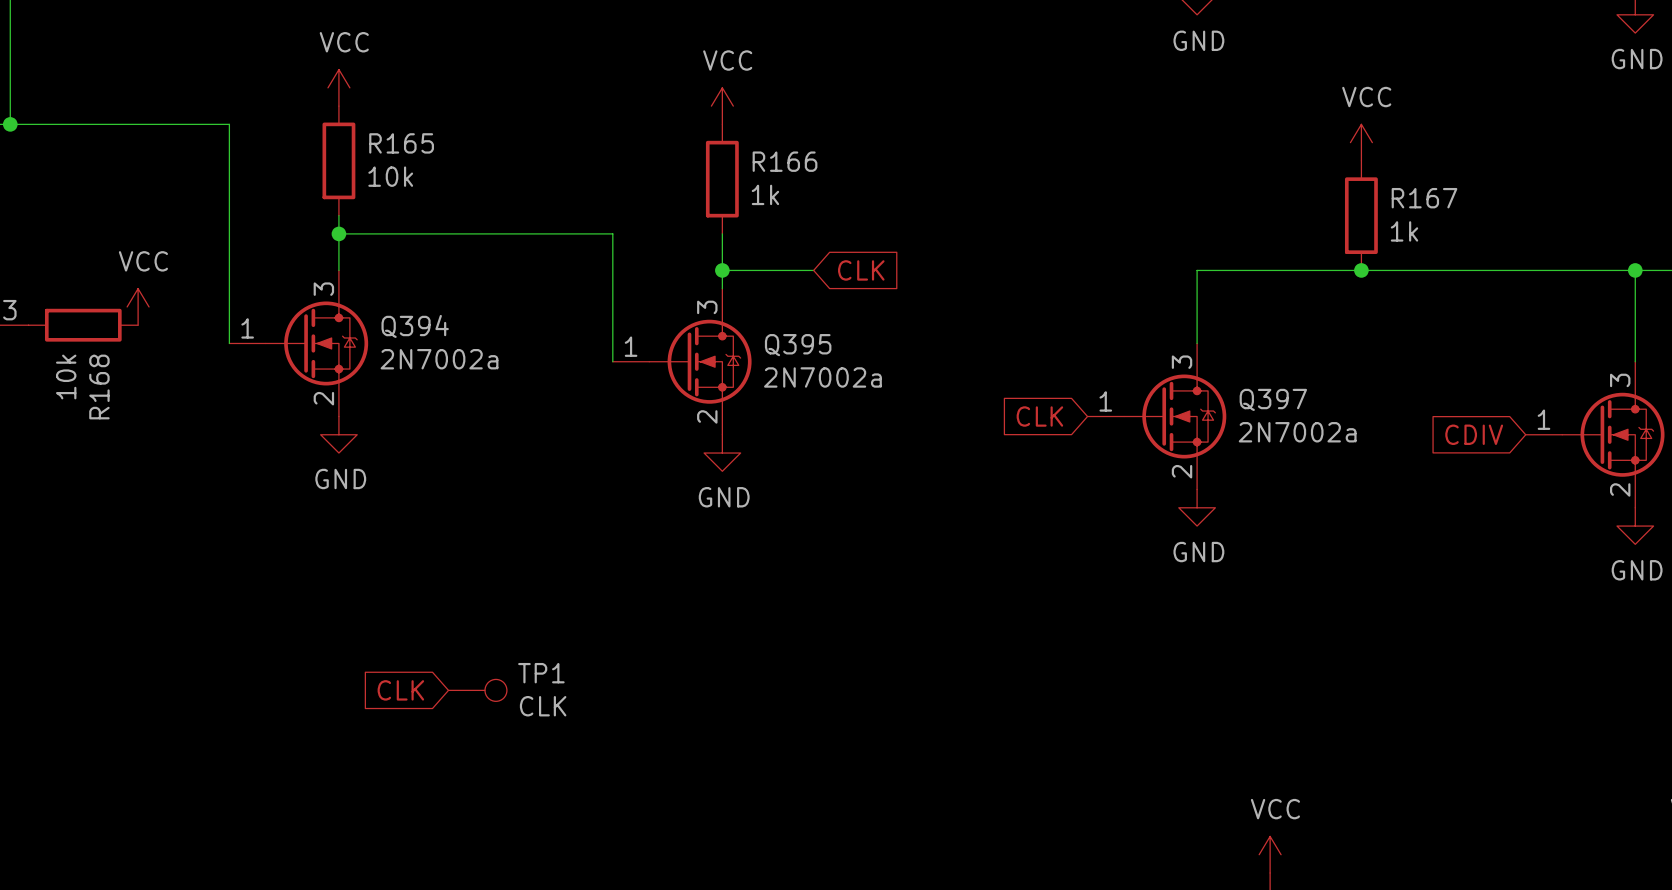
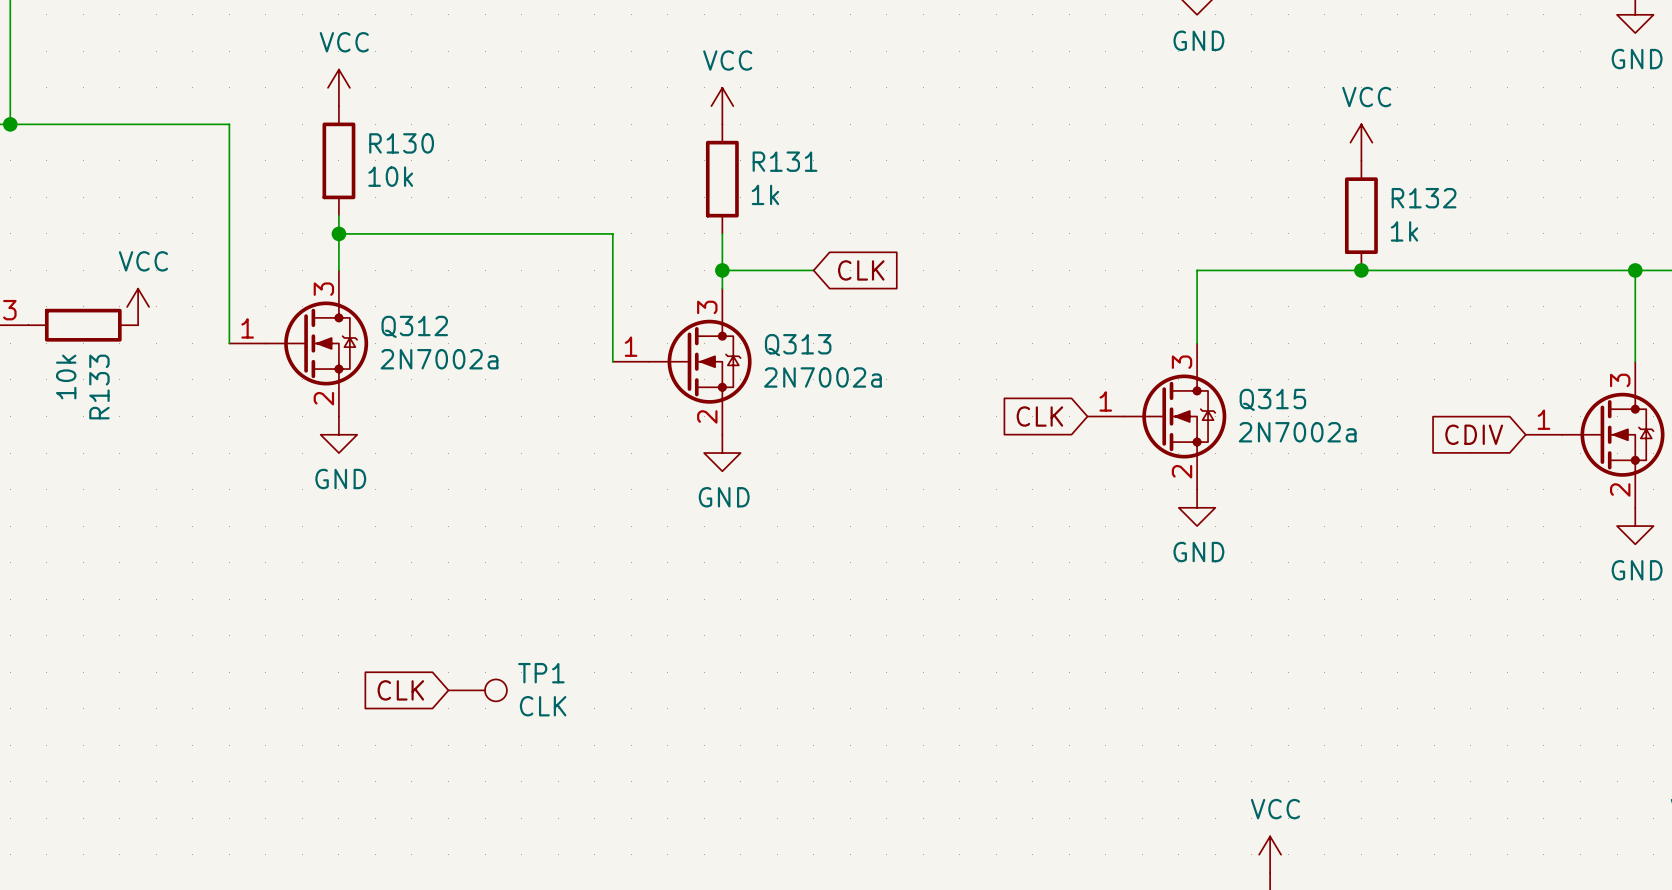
R165 name: R165 (401, 143) -> R130 (401, 143)
R166 name: R166 (785, 161) -> R131 (785, 161)
R167 name: R167 (1424, 198) -> R132 (1424, 198)
Q394 name: Q394 (415, 326) -> Q312 (414, 326)
Q395 name: Q395 (798, 345) -> Q313 (798, 345)
R168 name: R168 (99, 387) -> R133 (99, 387)
Q397 name: Q397 (1273, 399) -> Q315 (1272, 399)

